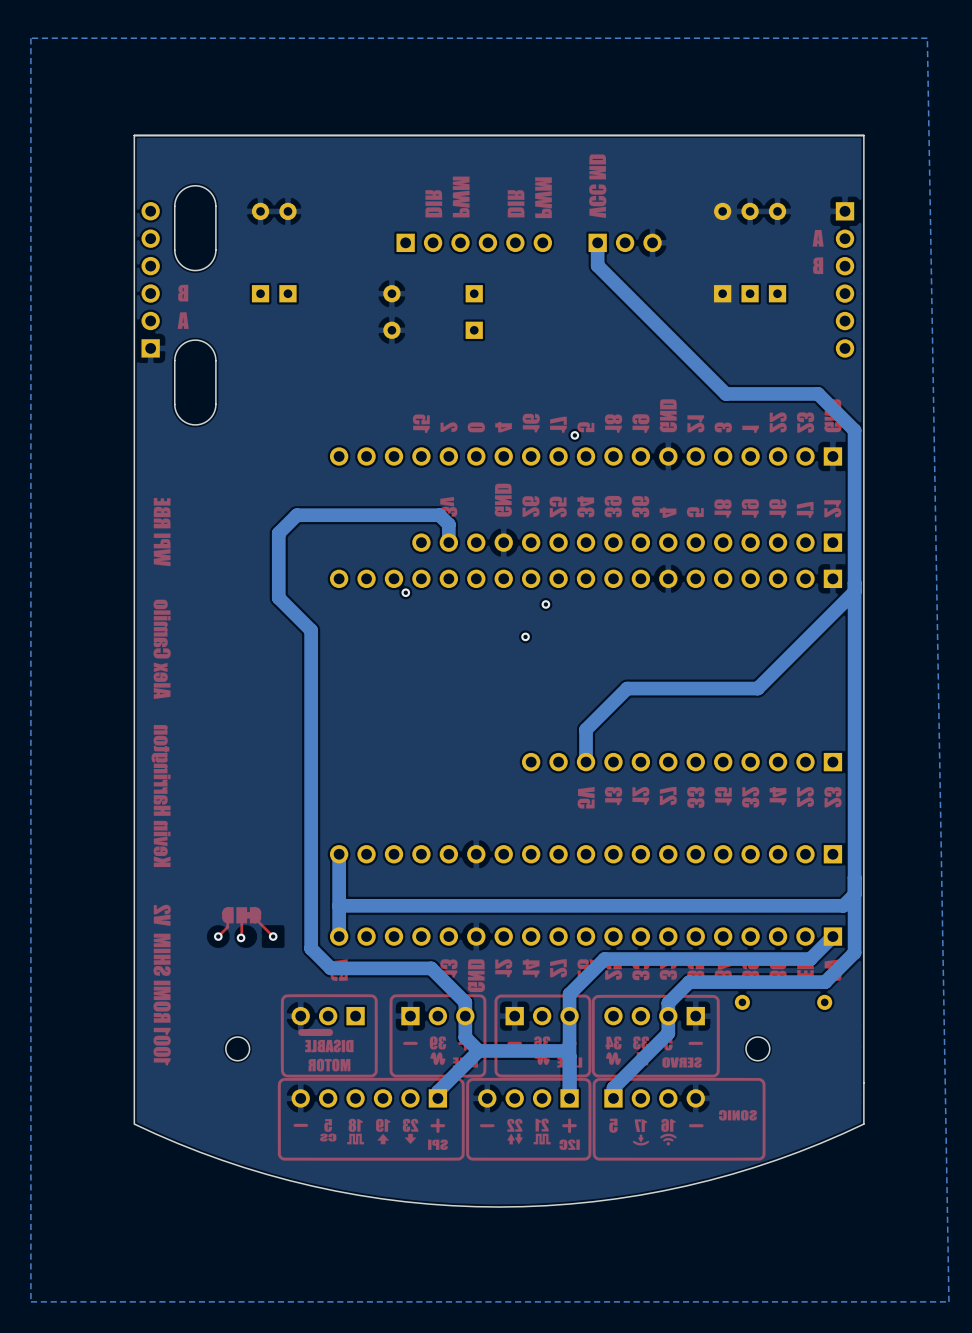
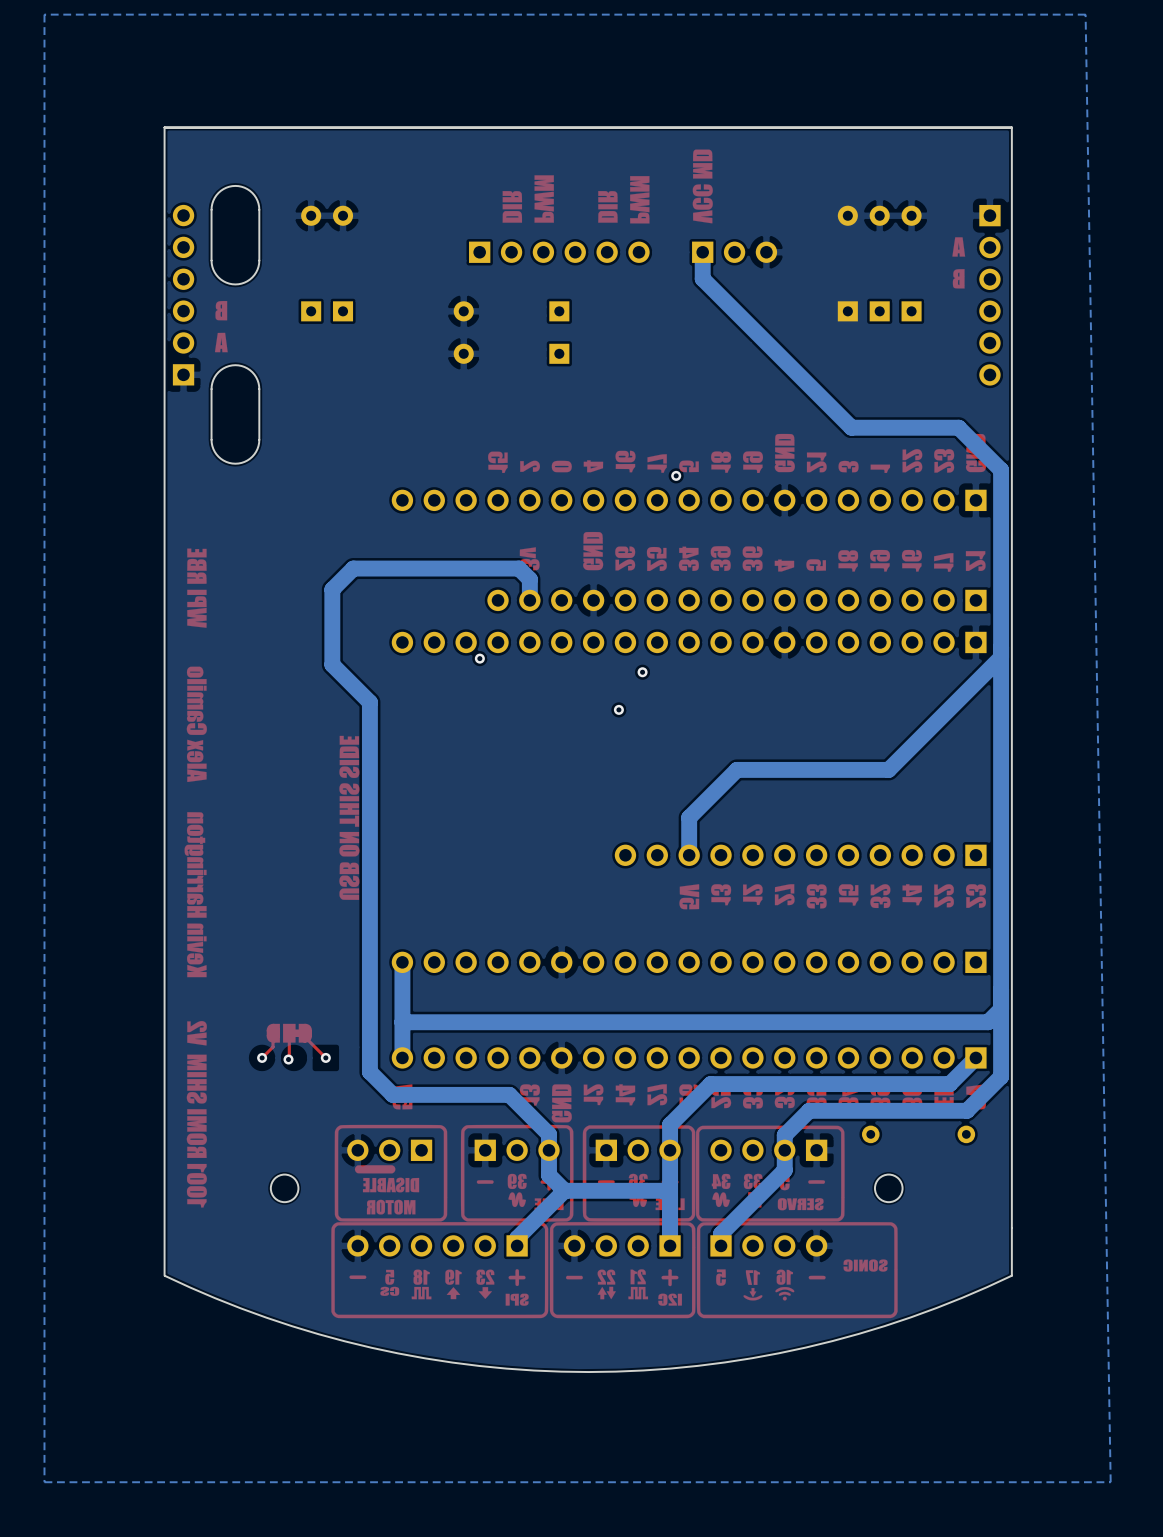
drawing shape: [151, 154, 842, 1161] -> [184, 149, 987, 1319]

